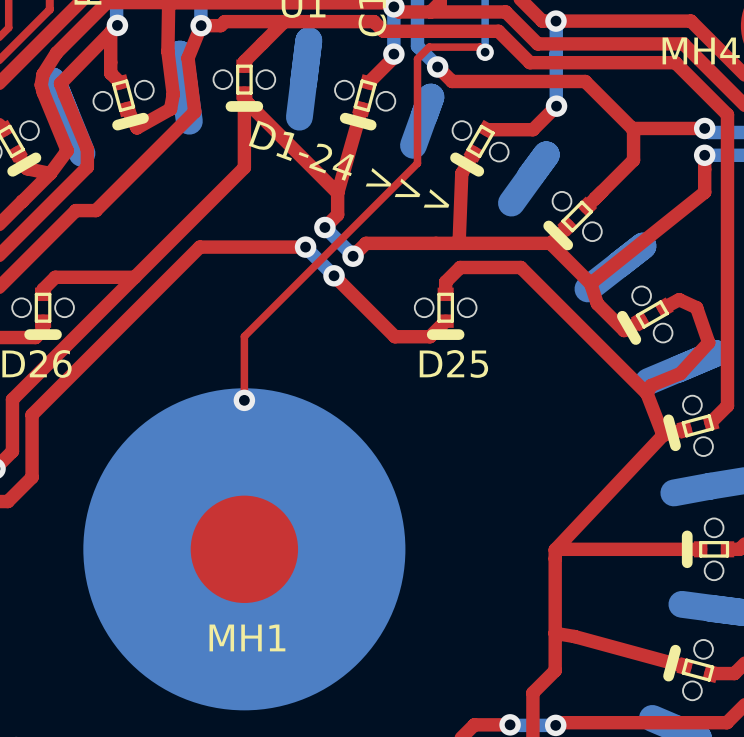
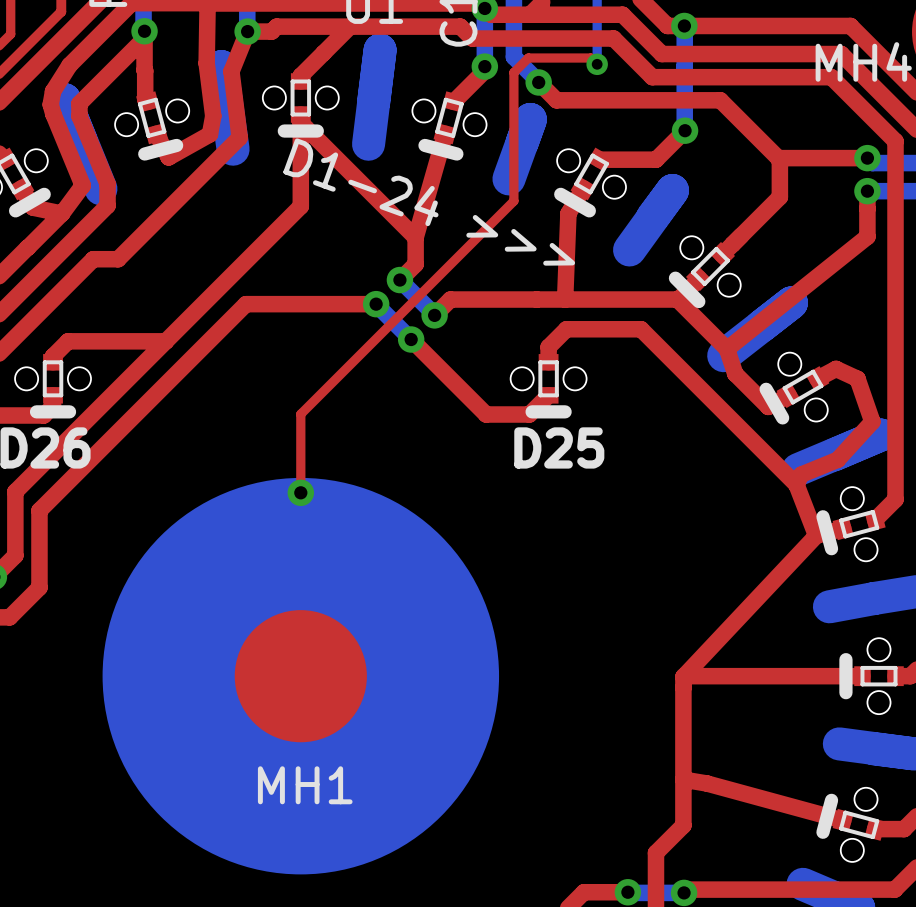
top track: none -> (144, 31) (145, 99)
top track: (117, 80) (110, 73) (110, 32) (117, 25) (60, 83) (64, 94) -> (144, 38) (79, 103) (79, 116)

